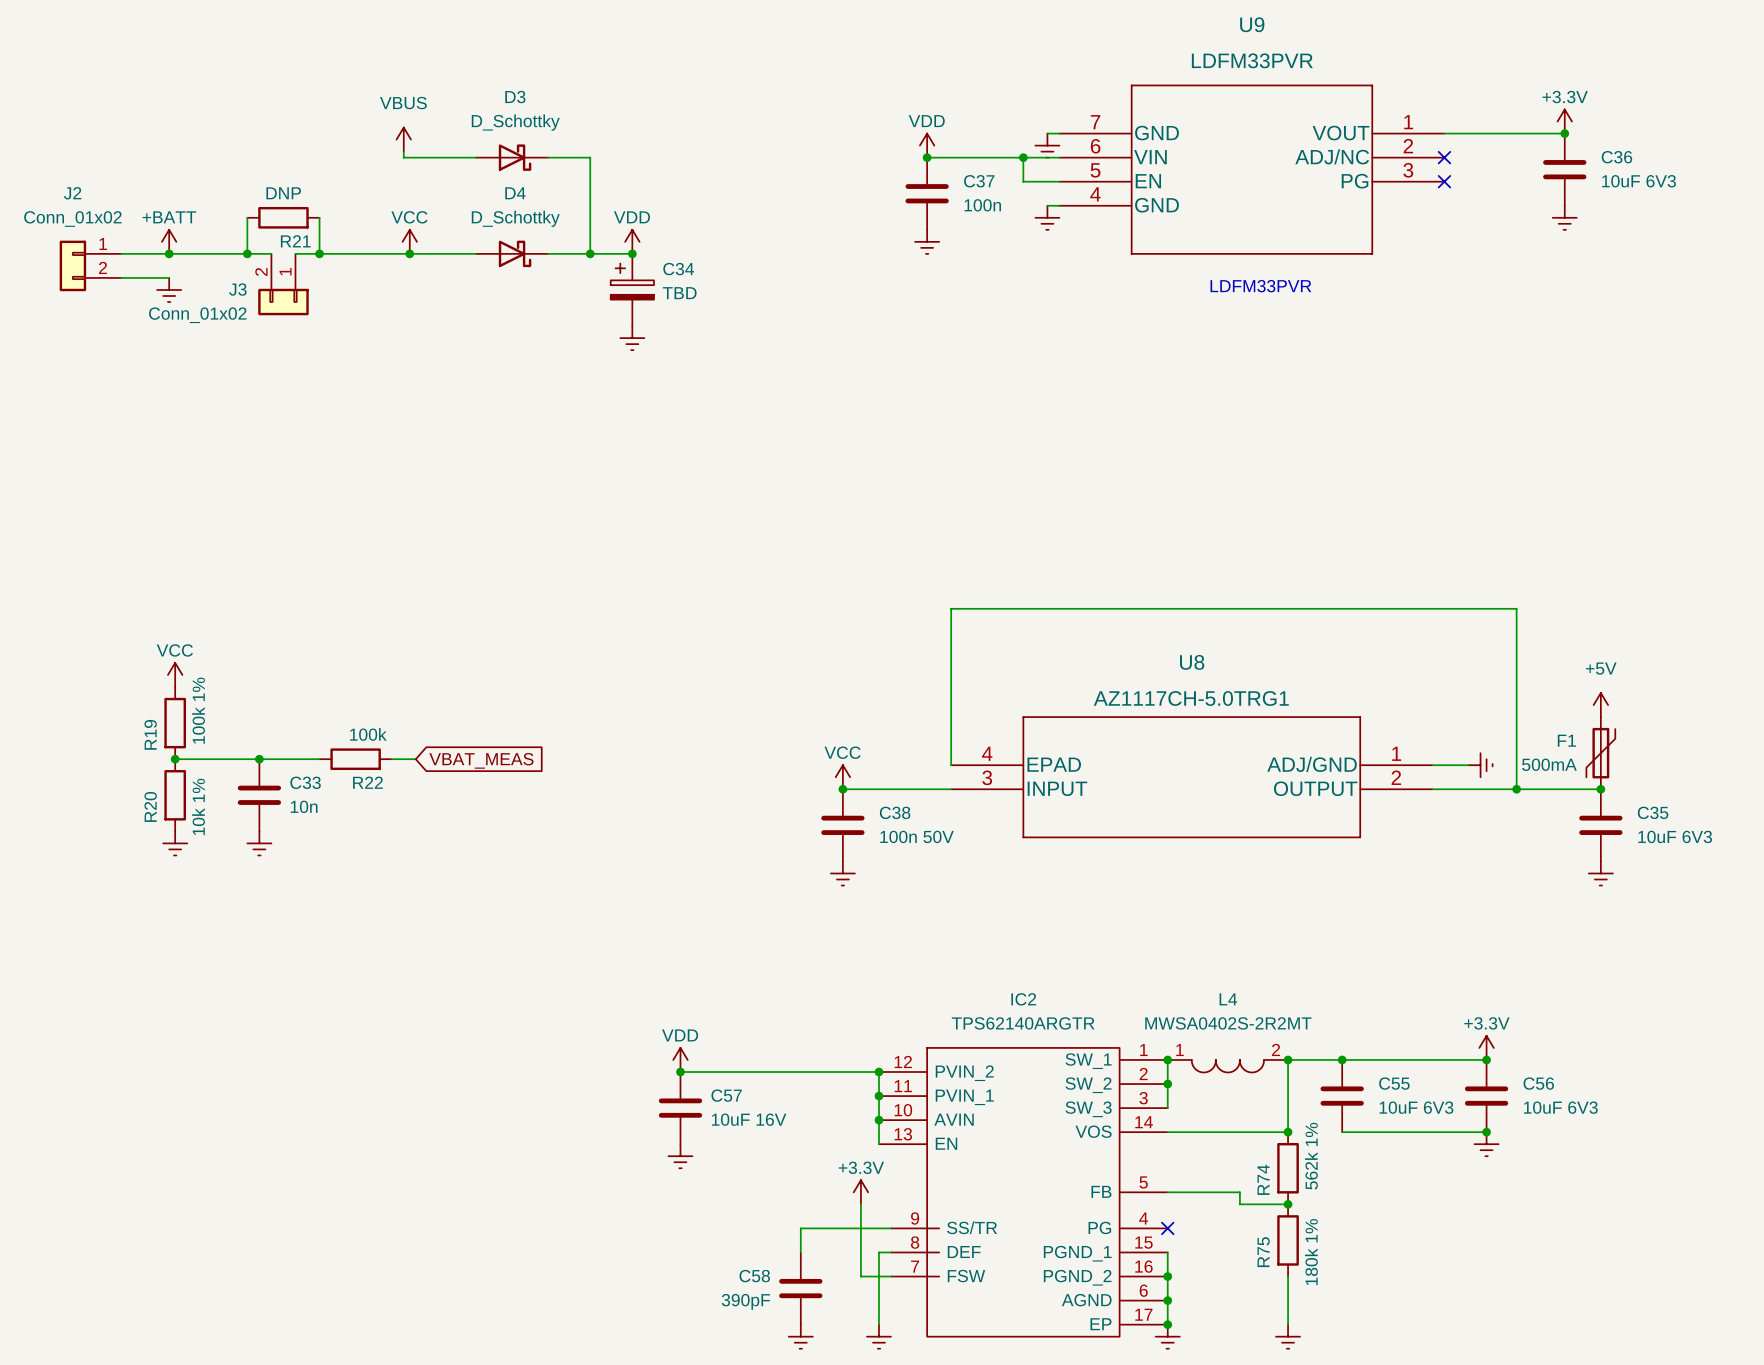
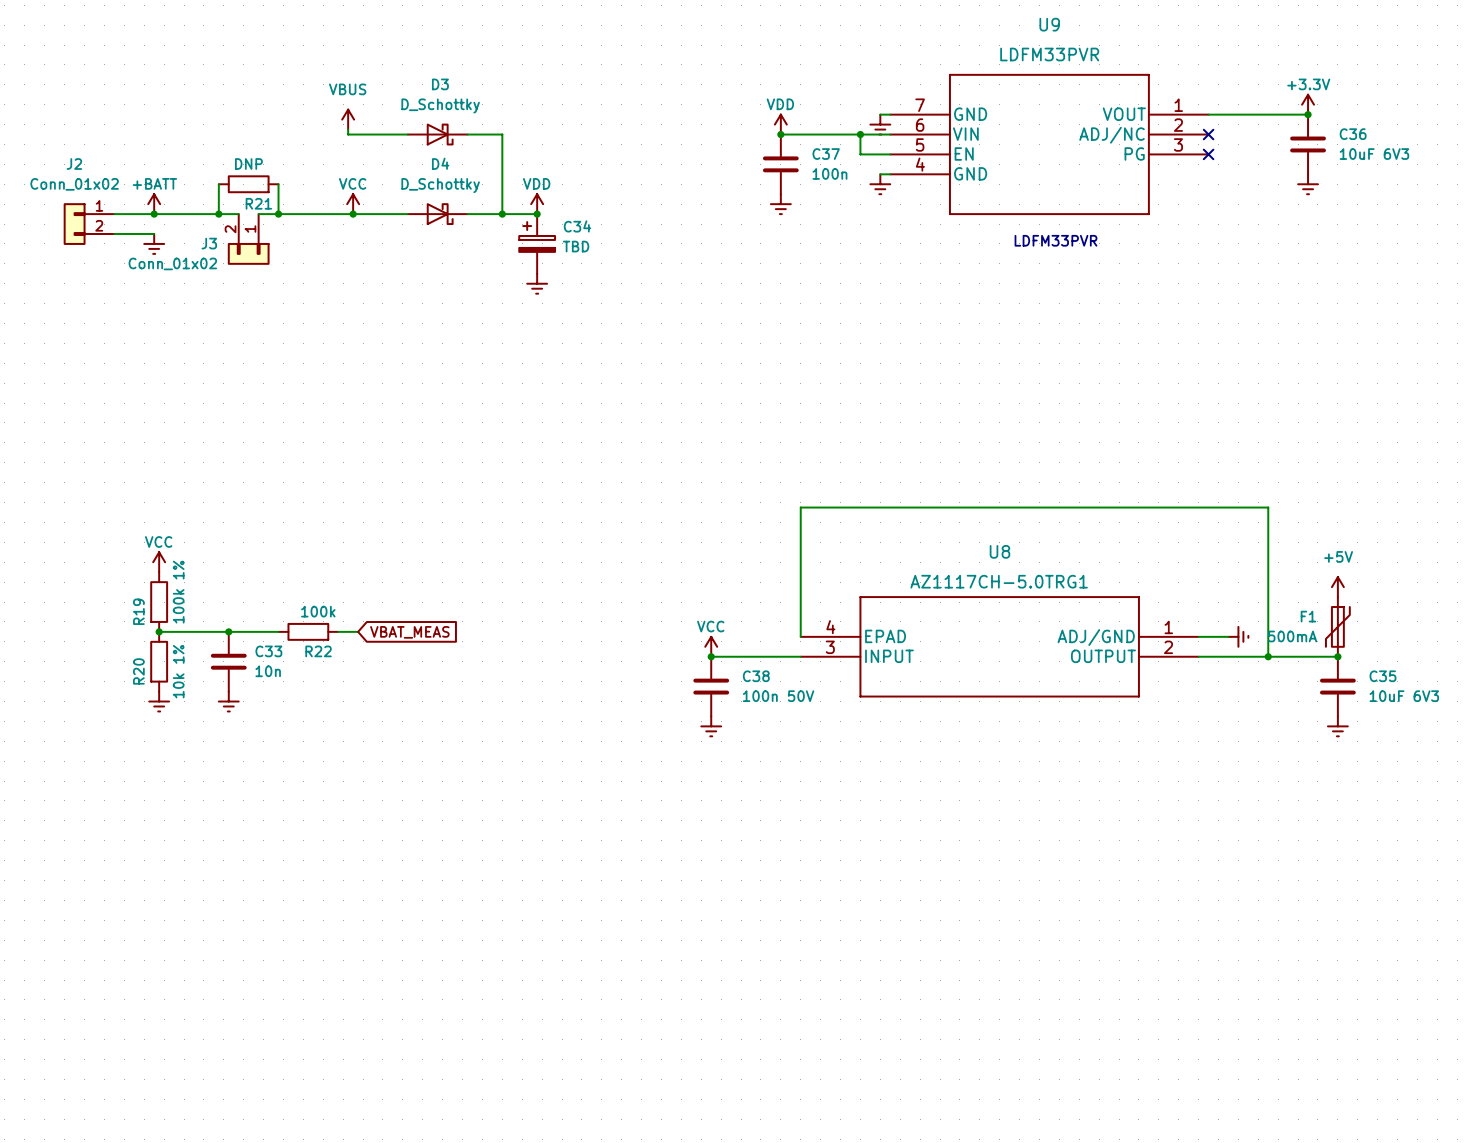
power symbol: +3.3V (1486, 1047) -> none
power symbol: VDD (680, 1059) -> none
wire: (1167, 1059) (1167, 1108) -> none
junction: (1167, 1059) -> none
junction: (1288, 1059) -> none
junction: (1342, 1059) -> none
wire: (1486, 1059) (1288, 1059) (1288, 1132) (1167, 1132) -> none
junction: (1486, 1059) -> none
L4: MWSA0402S-2R2MT (1227, 1066) -> none
wire: (680, 1072) (878, 1072) (878, 1144) -> none
junction: (680, 1072) -> none
junction: (878, 1072) -> none
junction: (1167, 1084) -> none
junction: (878, 1096) -> none
C55: 10uF 6V3 (1342, 1096) -> none
C56: 10uF 6V3 (1486, 1096) -> none
C57: 10uF 16V (680, 1108) -> none
junction: (878, 1120) -> none
junction: (1288, 1132) -> none
wire: (1342, 1132) (1486, 1132) -> none
junction: (1486, 1132) -> none
power symbol: (1486, 1144) -> none
power symbol: (680, 1156) -> none
R74: 562k 1% (1288, 1168) -> none
power symbol: +3.3V (860, 1192) -> none
IC2: TPS62140ARGTR (1023, 1192) -> none
wire: (1167, 1192) (1239, 1192) (1239, 1204) (1288, 1204) -> none
wire: (860, 1204) (860, 1276) (891, 1276) -> none
junction: (1288, 1204) -> none
wire: (891, 1228) (800, 1228) (800, 1252) -> none
no-connect mark: (1167, 1228) -> none
R75: 180k 1% (1288, 1240) -> none
wire: (891, 1252) (878, 1252) (878, 1324) -> none
wire: (1167, 1252) (1167, 1324) -> none
junction: (1167, 1276) -> none
wire: (1288, 1276) (1288, 1324) -> none
C58: 390pF (800, 1288) -> none
junction: (1167, 1300) -> none
junction: (1167, 1324) -> none
power symbol: (800, 1336) -> none
power symbol: (878, 1336) -> none
power symbol: (1167, 1336) -> none
power symbol: (1288, 1336) -> none

